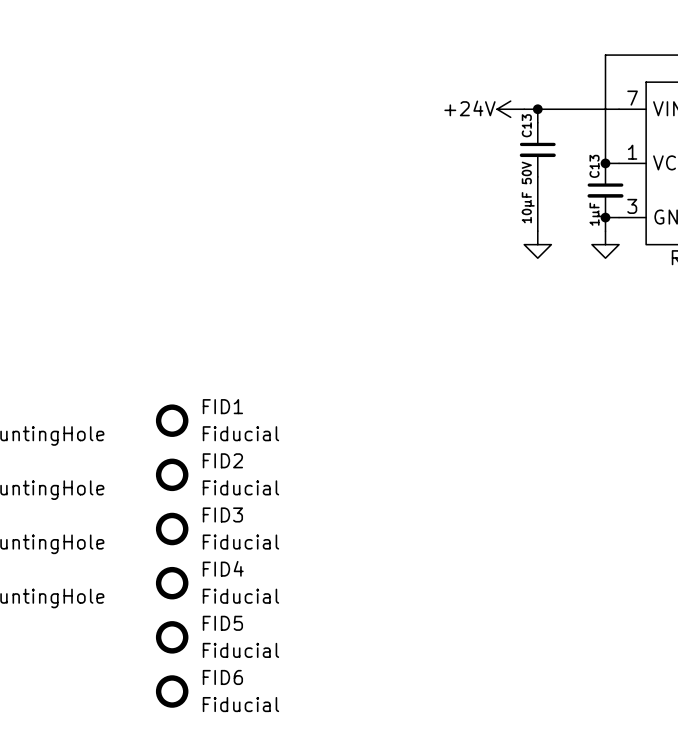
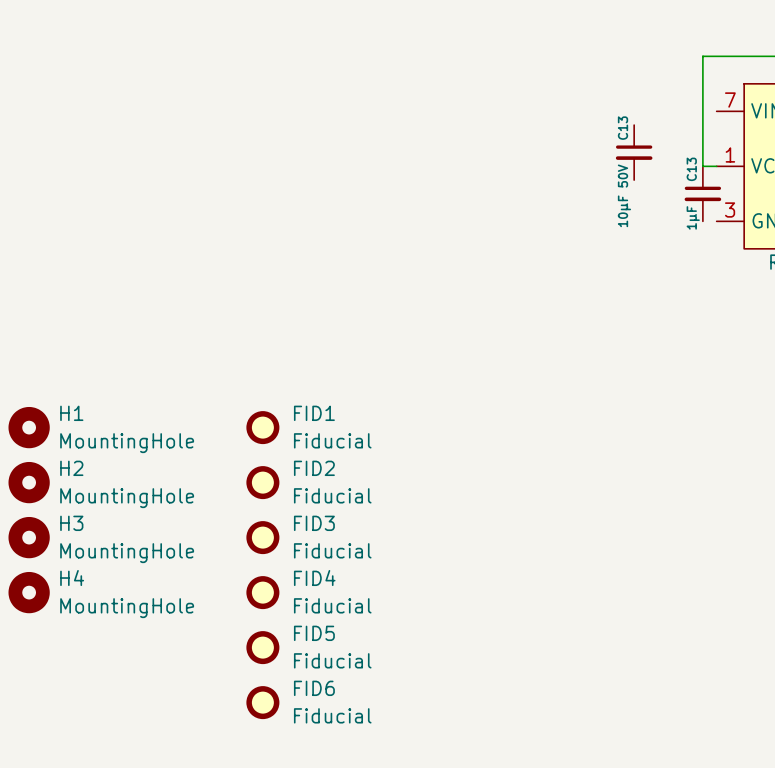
power symbol: +24V (510, 109) -> none
wire: (524, 109) (619, 109) -> none
wire: (537, 109) (537, 122) -> none
junction: (537, 109) -> none
junction: (605, 163) -> none
wire: (537, 176) (537, 231) -> none
junction: (605, 217) -> none
wire: (619, 217) (605, 217) (605, 231) -> none
power symbol: (537, 244) -> none
power symbol: (605, 244) -> none

